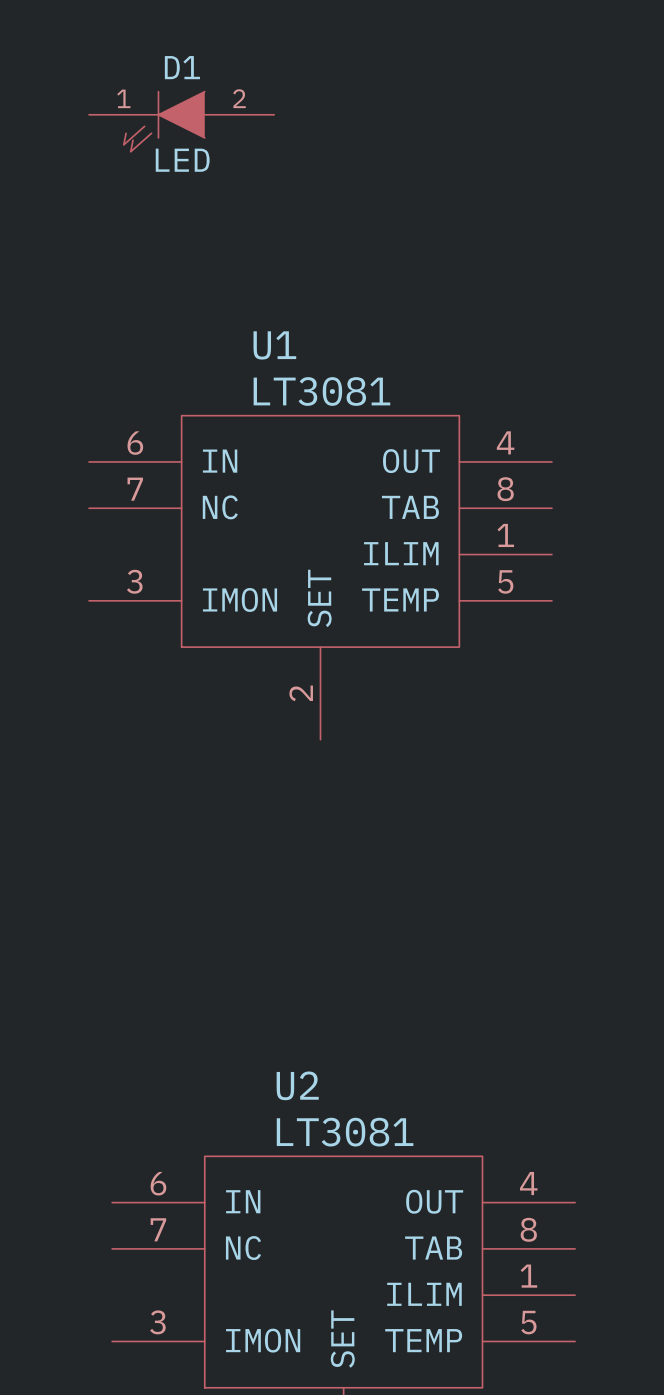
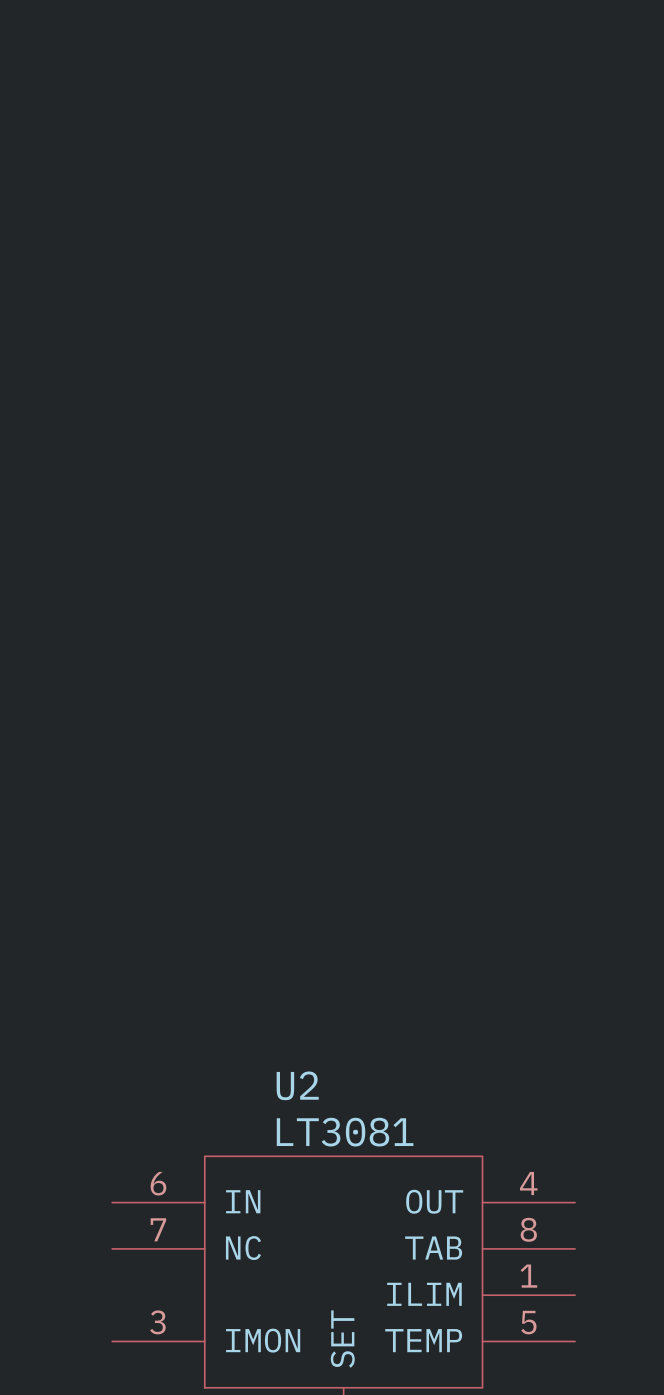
D1: LED (181, 121) -> none
U1: LT3081 (320, 577) -> none

